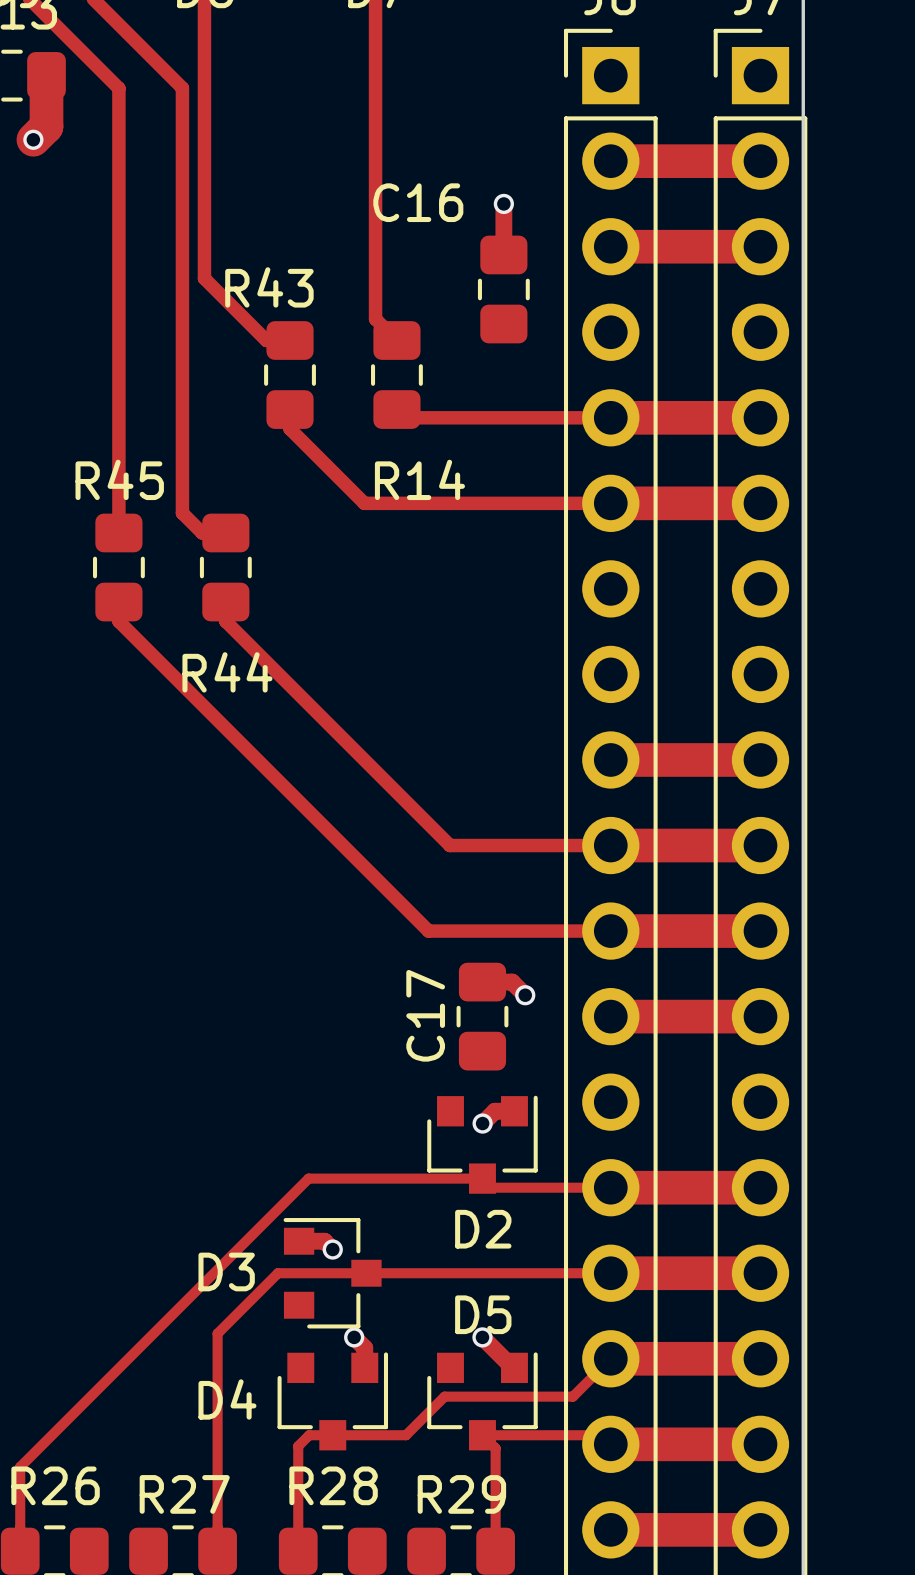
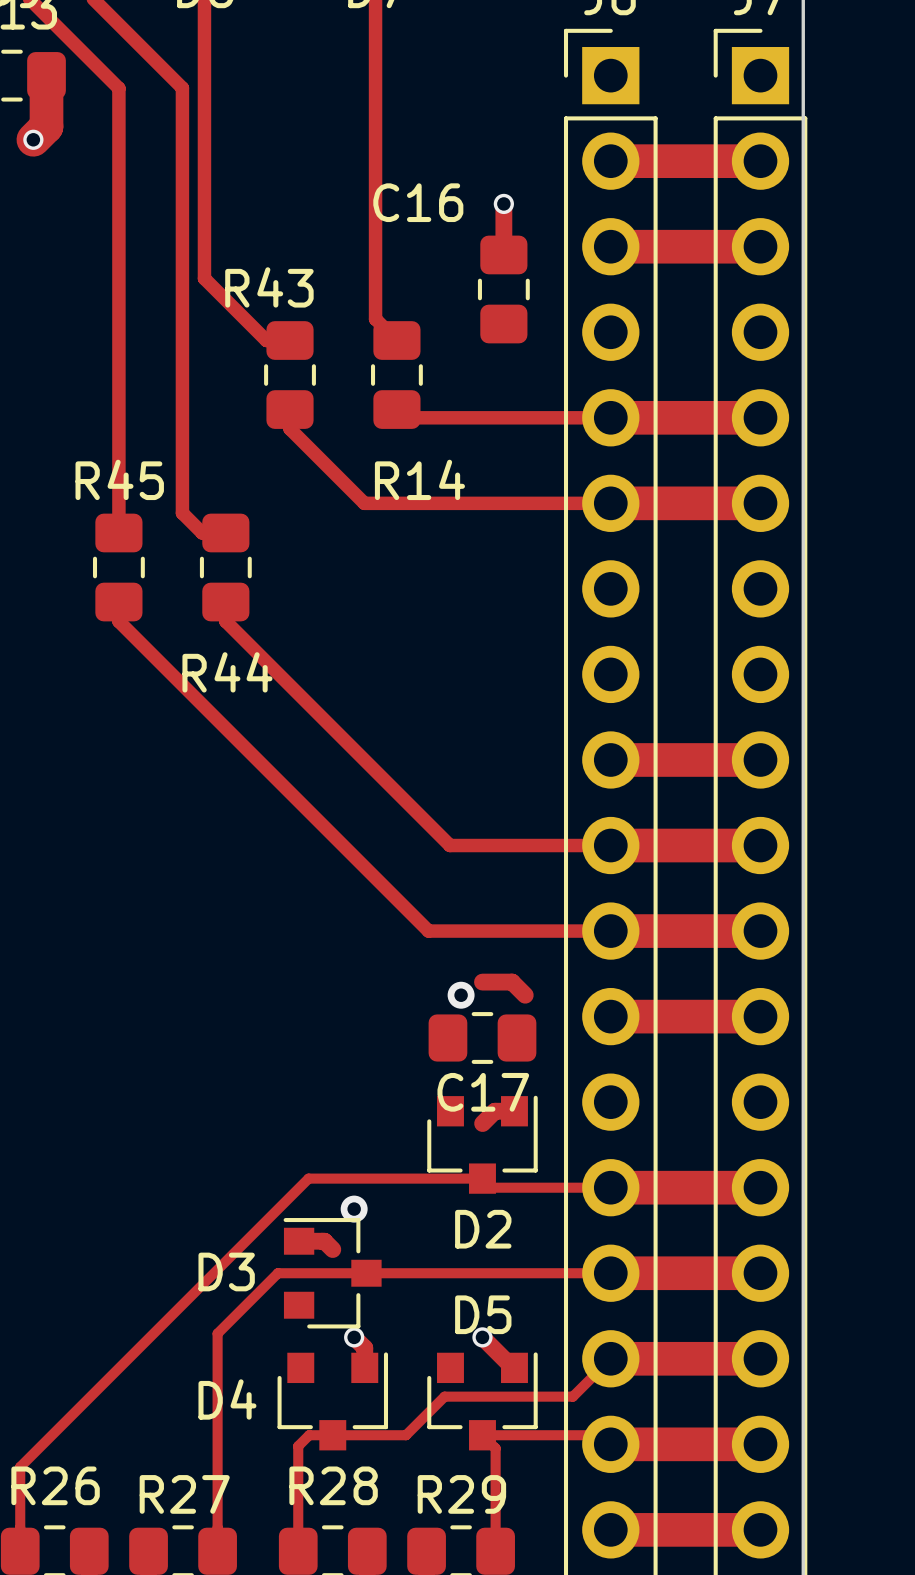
via: none -> (461, 995)
via: (525, 995) -> none
C17 name position: C17 (425, 1015) -> C17 (483, 1092)
C17 rotation: 0° (482, 1016) -> 90° clockwise (482, 1037)
via: (482, 1123) -> none
via: none -> (354, 1209)
via: (332, 1249) -> none

